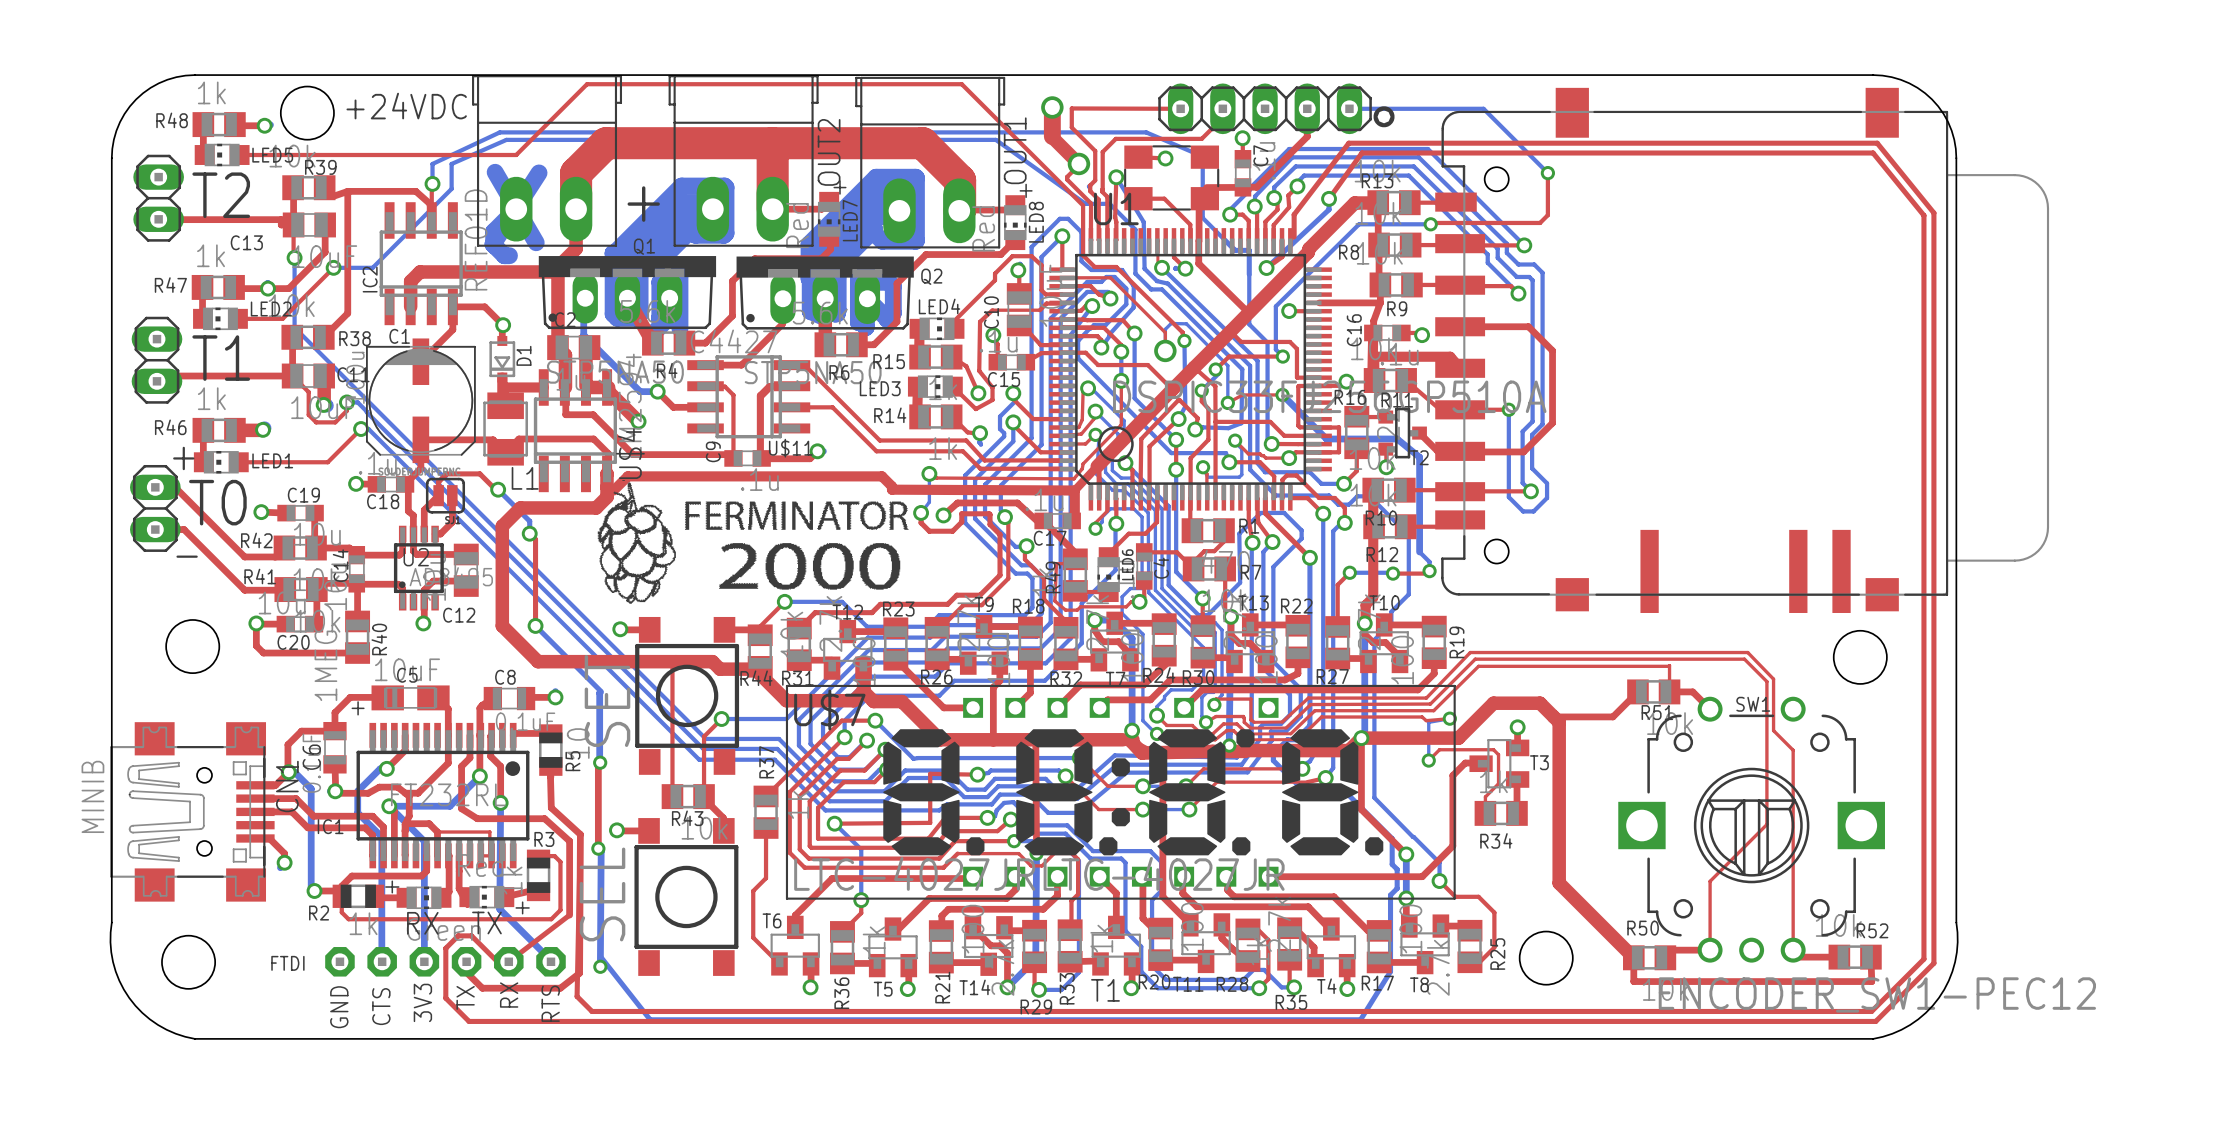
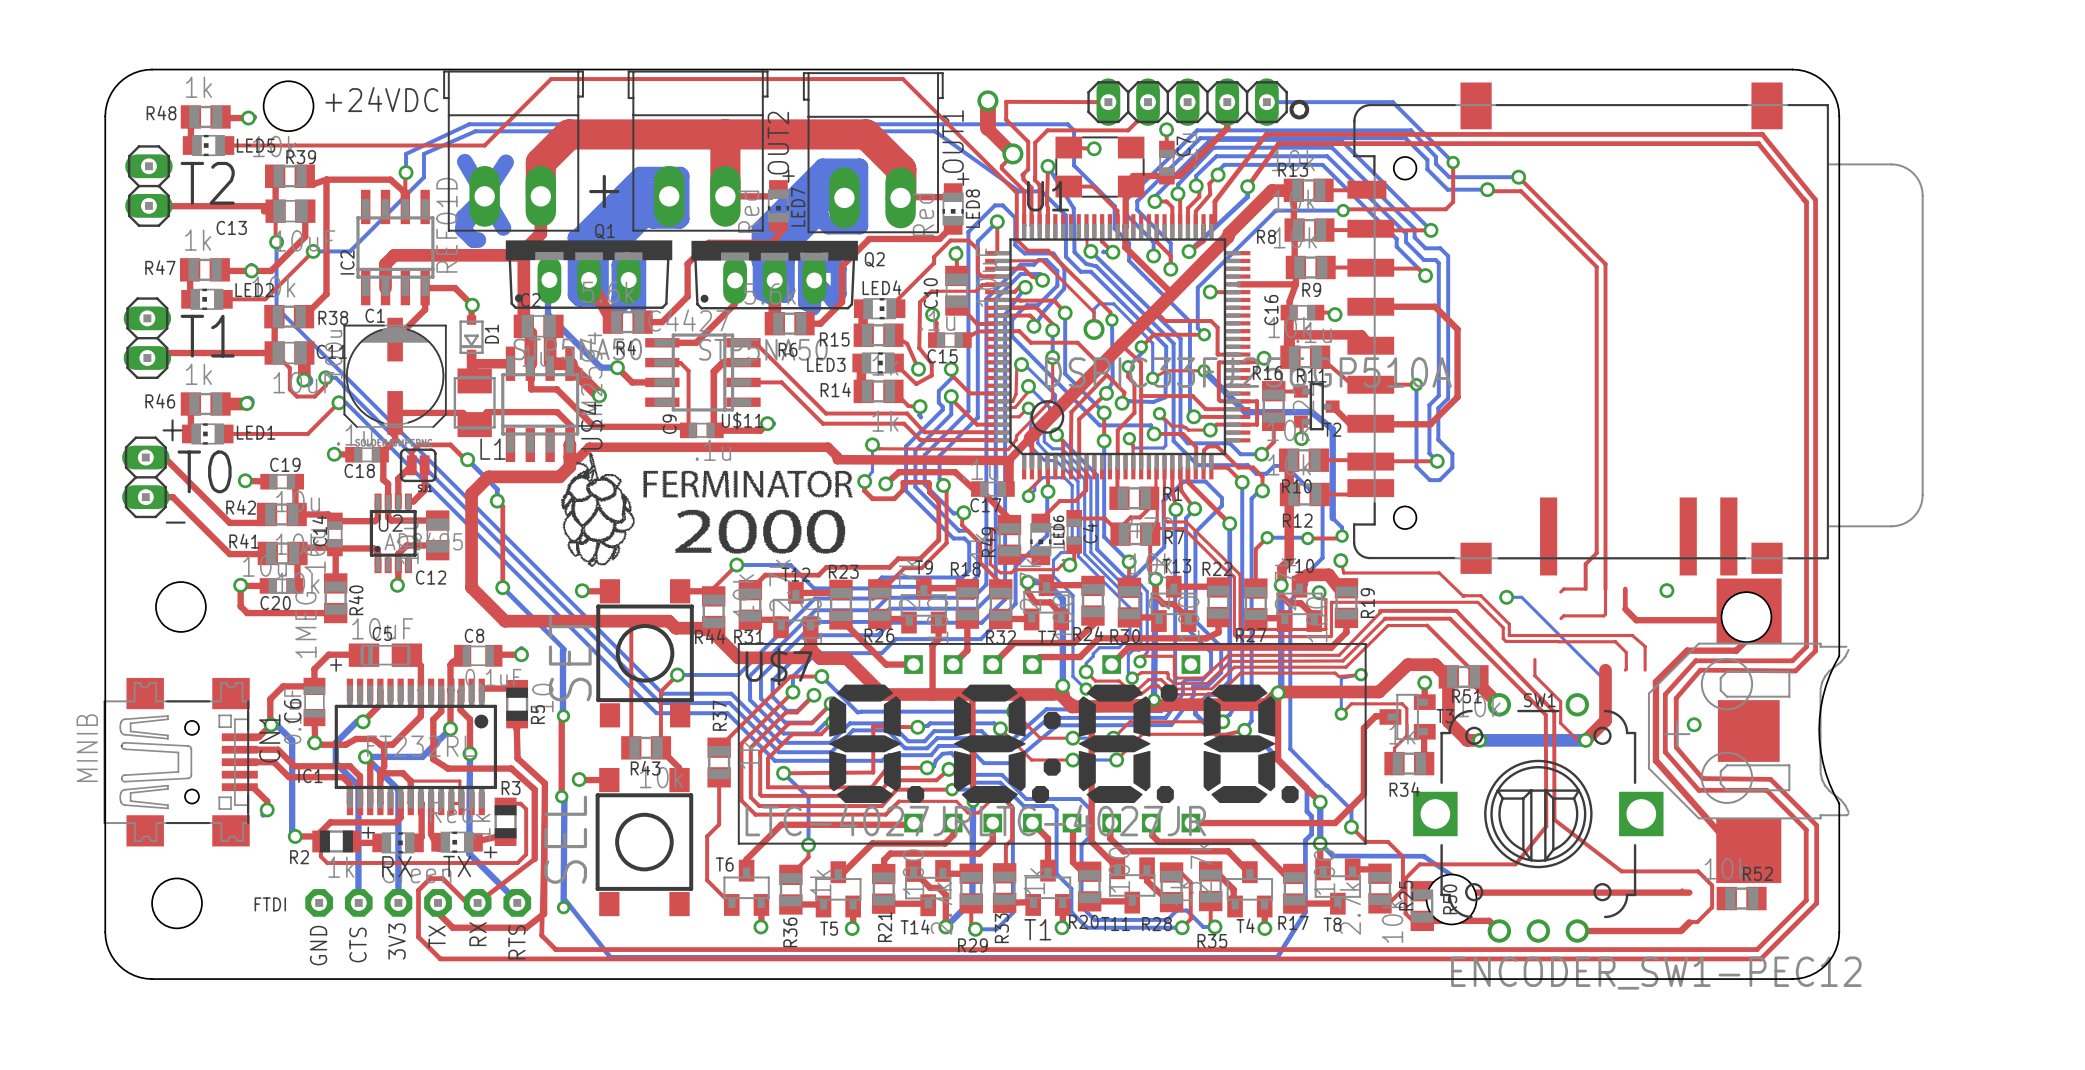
board edge: (194, 75) (1873, 75) (1891, 77) (1909, 83) (1925, 93) (1943, 113) (1951, 130) (1956, 158) (1957, 942) (1955, 961) (1944, 989) (1932, 1005) (1910, 1024) (1892, 1033) (1873, 1038) (194, 1038) (166, 1029) (142, 1012) (123, 989) (113, 961) (110, 942) (111, 158) (116, 130) (124, 113) (136, 99) (150, 87) (167, 79) (194, 75) -> (152, 69) (134, 73) (118, 83) (108, 98) (105, 116) (105, 932) (106, 944) (111, 955) (118, 965) (128, 972) (139, 977) (152, 979) (1792, 979) (1804, 977) (1815, 972) (1825, 965) (1833, 955) (1837, 944) (1839, 932) (1839, 803) (1829, 783) (1822, 762) (1819, 729) (1822, 696) (1829, 675) (1839, 656) (1839, 116) (1837, 104) (1833, 92) (1825, 83) (1815, 75) (1804, 71) (1792, 69) (152, 69)
bottom track: (1137, 132) (1146, 132) (1202, 156) (1202, 217) (1235, 250) (1249, 250) (1249, 324) -> (1067, 124) (1074, 130) (1074, 165) (1114, 206) (1114, 228) (1129, 243) (1129, 260) (1172, 304)
top track: none -> (1518, 177) (1605, 264) (1605, 614) (1603, 615) (1563, 615) (1560, 618)
bottom track: none -> (1518, 177) (1449, 177) (1436, 163) (1436, 156) (1411, 130) (1197, 130) (1125, 200) (1125, 213) (1153, 241) (1153, 255)
via: none -> (1518, 177)
top track: none -> (1487, 189) (1521, 191) (1596, 266) (1596, 553) (1585, 564) (1585, 589) (1563, 589) (1560, 592)
bottom track: none -> (1487, 189) (1447, 189) (1427, 169) (1427, 160) (1405, 138) (1200, 138) (1137, 201) (1137, 209) (1170, 243) (1170, 269)
via: none -> (1487, 189)
top track: (1923, 215) (1923, 883) -> (1803, 199) (1806, 202) (1806, 646) (1792, 660) (1695, 660) (1665, 694) (1665, 752) (1698, 790) (1766, 790) (1806, 829)
top track: none -> (1156, 225) (1156, 241) (1170, 255) (1170, 269)
via: none -> (1153, 255)
via: none -> (1170, 269)
top track: none -> (1156, 467) (1157, 527) (1184, 528) (1233, 576) (1234, 635) (1237, 637) (1330, 636) (1331, 602) (1477, 602) (1503, 627) (1503, 638) (1506, 641) (1615, 641) (1626, 652) (1625, 670)
top track: none -> (1164, 467) (1164, 518) (1167, 521) (1186, 521) (1240, 574) (1240, 629) (1325, 629) (1325, 599) (1321, 598) (1319, 592)
top track: none -> (1340, 560) (1343, 572) (1439, 572) (1463, 596) (1480, 595) (1509, 624) (1509, 635) (1632, 635) (1645, 646) (1645, 670)
via: none -> (1340, 560)
top track: none -> (1298, 579) (1308, 574) (1328, 574) (1339, 588) (1348, 587) (1346, 586)
top track: (1384, 624) (1434, 624) (1434, 626) -> none
top track: none -> (1625, 589) (1625, 609) (1636, 620) (1739, 620) (1749, 611) (1749, 637) (1736, 650) (1687, 650) (1655, 681) (1655, 760) (1737, 852) (1740, 842) (1748, 850)
via: none -> (1666, 590)
via: none -> (1319, 592)
bottom track: none -> (1506, 597) (1521, 597) (1605, 681) (1605, 720) (1585, 740) (1479, 740)
via: none -> (1506, 597)
top track: (1470, 652) (1747, 652) (1773, 679) (1773, 730) (1793, 750) (1793, 950) (1795, 957) (1839, 957) -> (1380, 612) (1380, 610) (1456, 610) (1554, 711) (1554, 819) (1621, 871) (1698, 871) (1712, 885) (1712, 907) (1697, 922) (1691, 922) (1682, 931) (1577, 931) (1680, 931) (1689, 922)
top track: (1475, 659) (1744, 659) (1766, 681) (1766, 824) (1710, 881) (1710, 950) (1673, 950) (1665, 957) -> (1385, 618) (1450, 618) (1545, 714) (1546, 826) (1515, 864) (1419, 864) (1405, 878) (1405, 913) (1412, 920) (1489, 920) (1499, 931)
top track: (1520, 666) (1669, 665) (1669, 691) (1692, 691) (1710, 709) -> (1427, 625) (1478, 676) (1478, 683) (1499, 704)
top track: (1637, 691) (1612, 716) (1553, 716) -> none
R51 position: (1653, 691) -> (1463, 676)
top track: (1933, 693) (1933, 963) -> (1815, 650) (1795, 670) (1700, 670) (1676, 698) (1676, 747) (1702, 778) (1770, 779) (1816, 825) (1815, 904)
top track: none -> (1534, 659) (1534, 675) (1560, 701) (1560, 723) (1577, 740) (1585, 740) (1605, 720) (1605, 670)
top track: (1361, 738) (1458, 738) (1493, 703) (1540, 703) (1559, 722) (1559, 883) (1633, 957) (1633, 981) (1871, 981) (1870, 957) -> (1278, 692) (1379, 692) (1407, 664) (1435, 664) (1448, 676) (1448, 721) (1467, 740) (1479, 740)
via: none -> (1694, 724)
part: none -> (1748, 730)
via: none -> (1479, 740)
via: none -> (1585, 740)
SW1 position: (1751, 829) -> (1538, 817)
bottom track: none -> (1320, 843) (1332, 855) (1423, 856) (1463, 883)
top track: none -> (1463, 883) (1455, 891) (1422, 891) (1689, 892)
R50 rotation: 0° (1649, 957) -> 90° clockwise (1422, 906)
R50 position: (1649, 957) -> (1422, 906)

